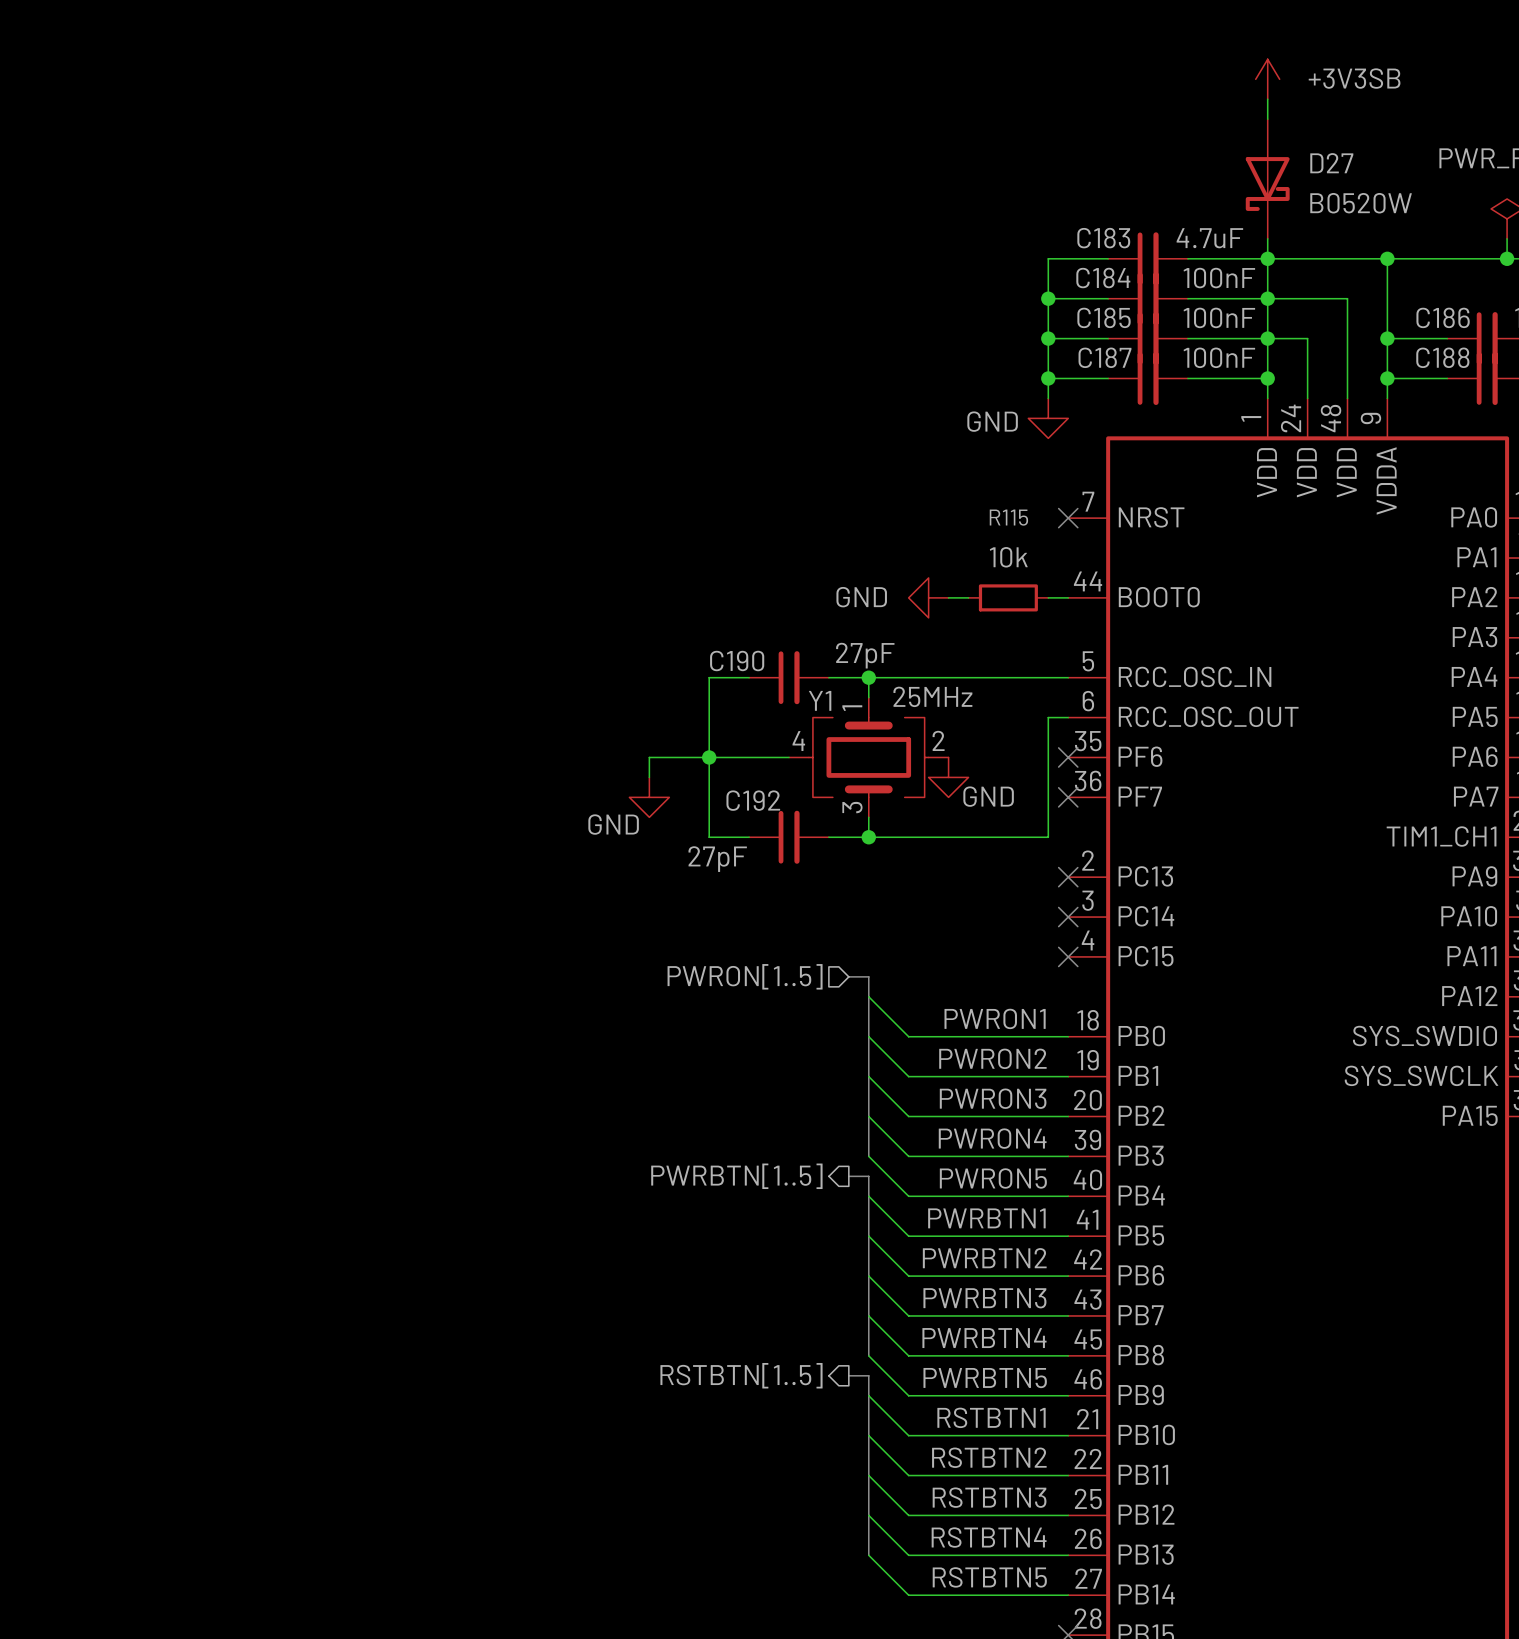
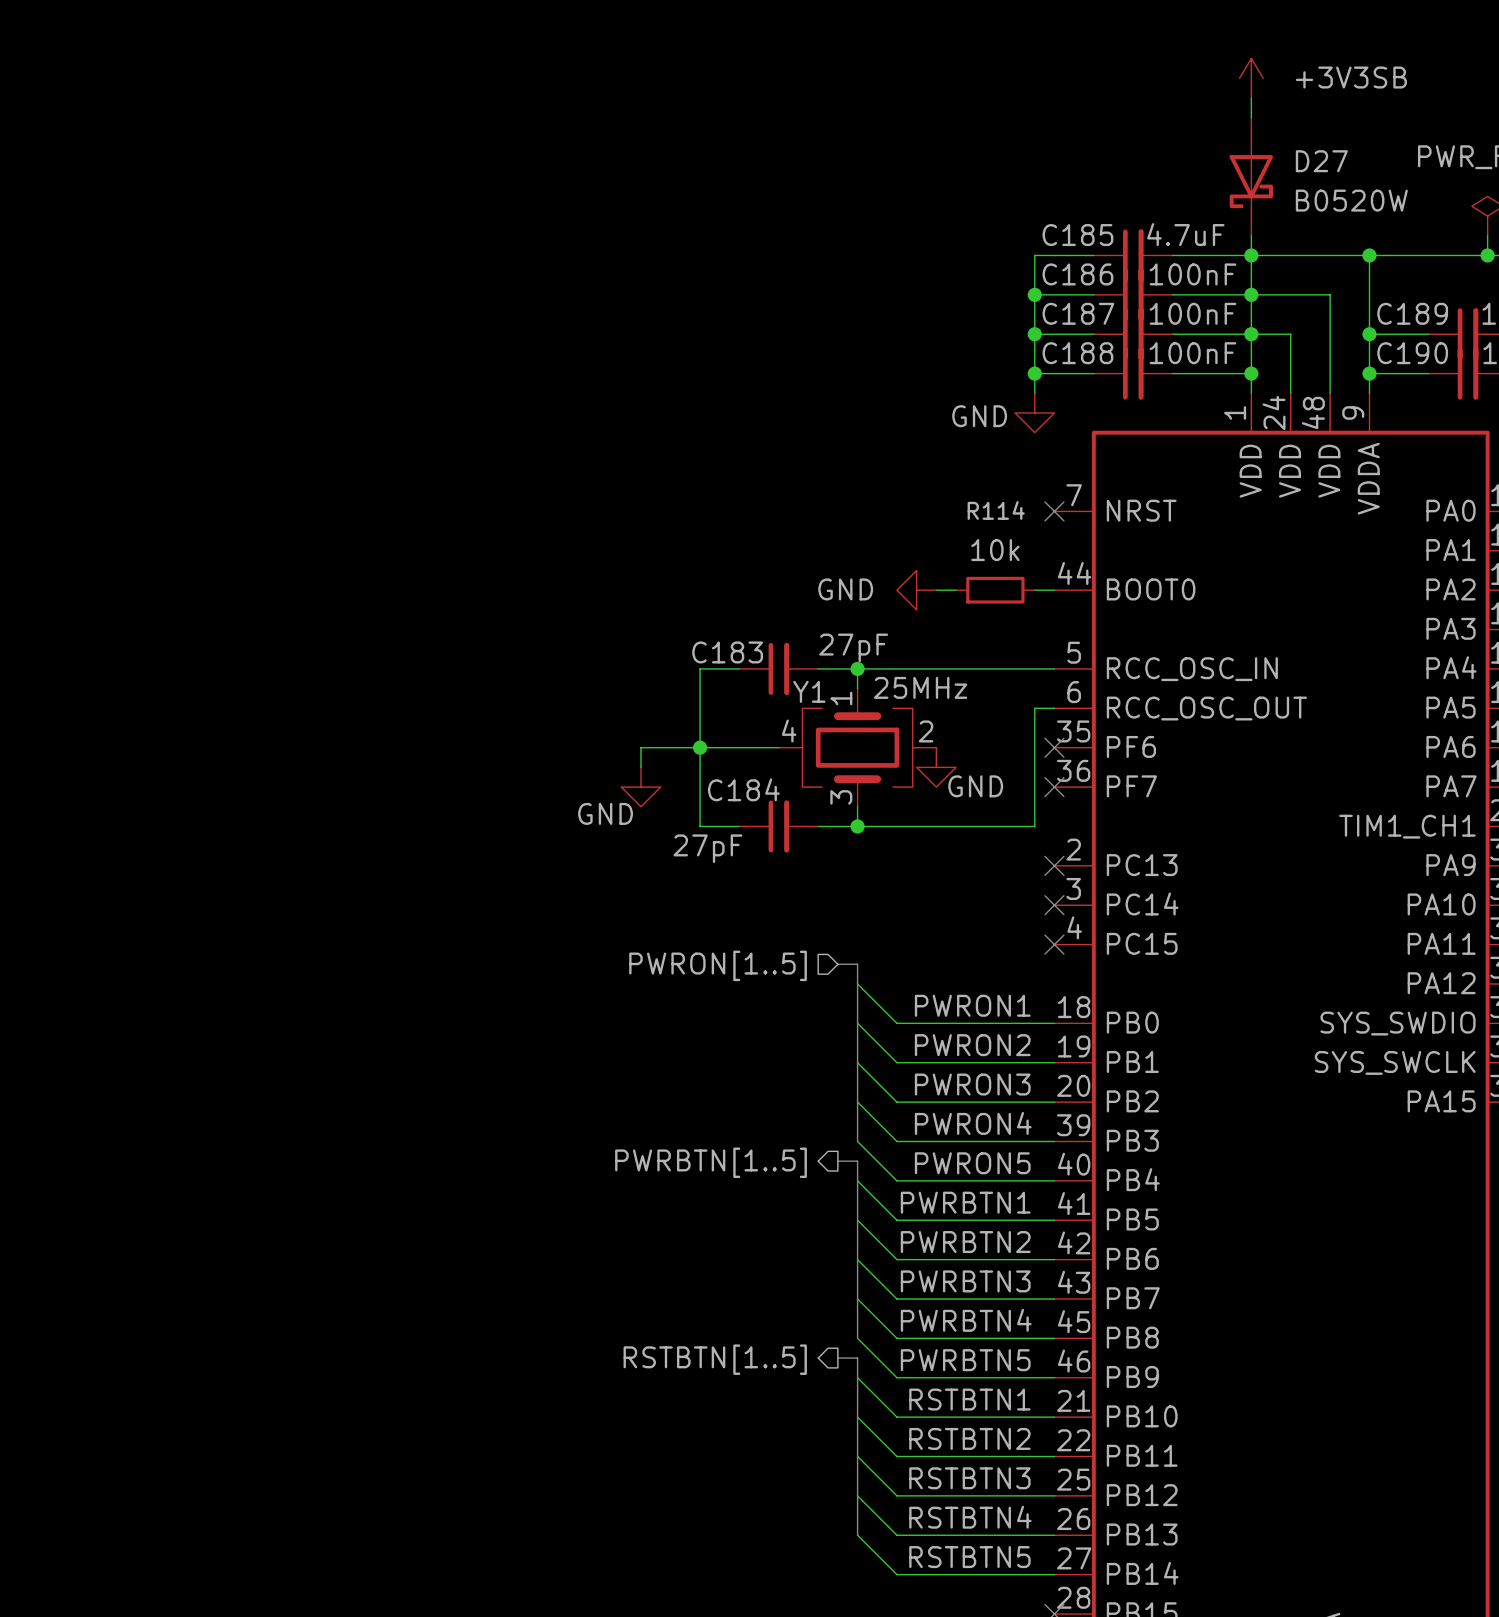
C183 name: C183 (1103, 238) -> C185 (1077, 235)
C184 name: C184 (1103, 278) -> C186 (1077, 274)
C185 name: C185 (1104, 317) -> C187 (1078, 313)
C186 name: C186 (1443, 317) -> C189 (1412, 313)
C187 name: C187 (1104, 357) -> C188 (1077, 353)
C188 name: C188 (1442, 357) -> C190 (1412, 353)
R115 name: R115 (1008, 517) -> R114 (996, 510)
C190 name: C190 (737, 661) -> C183 (727, 652)
C192 name: C192 (753, 800) -> C184 (743, 789)

